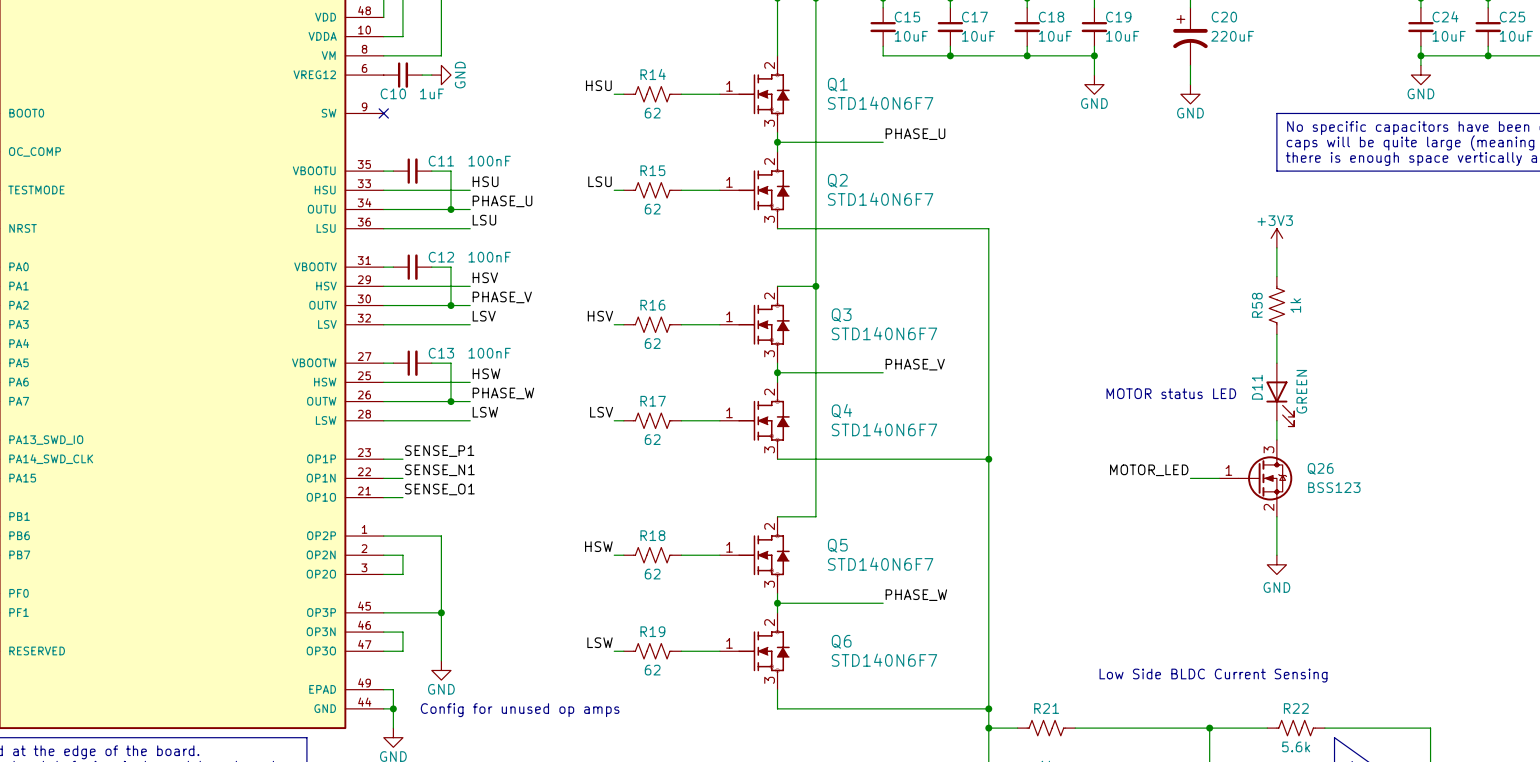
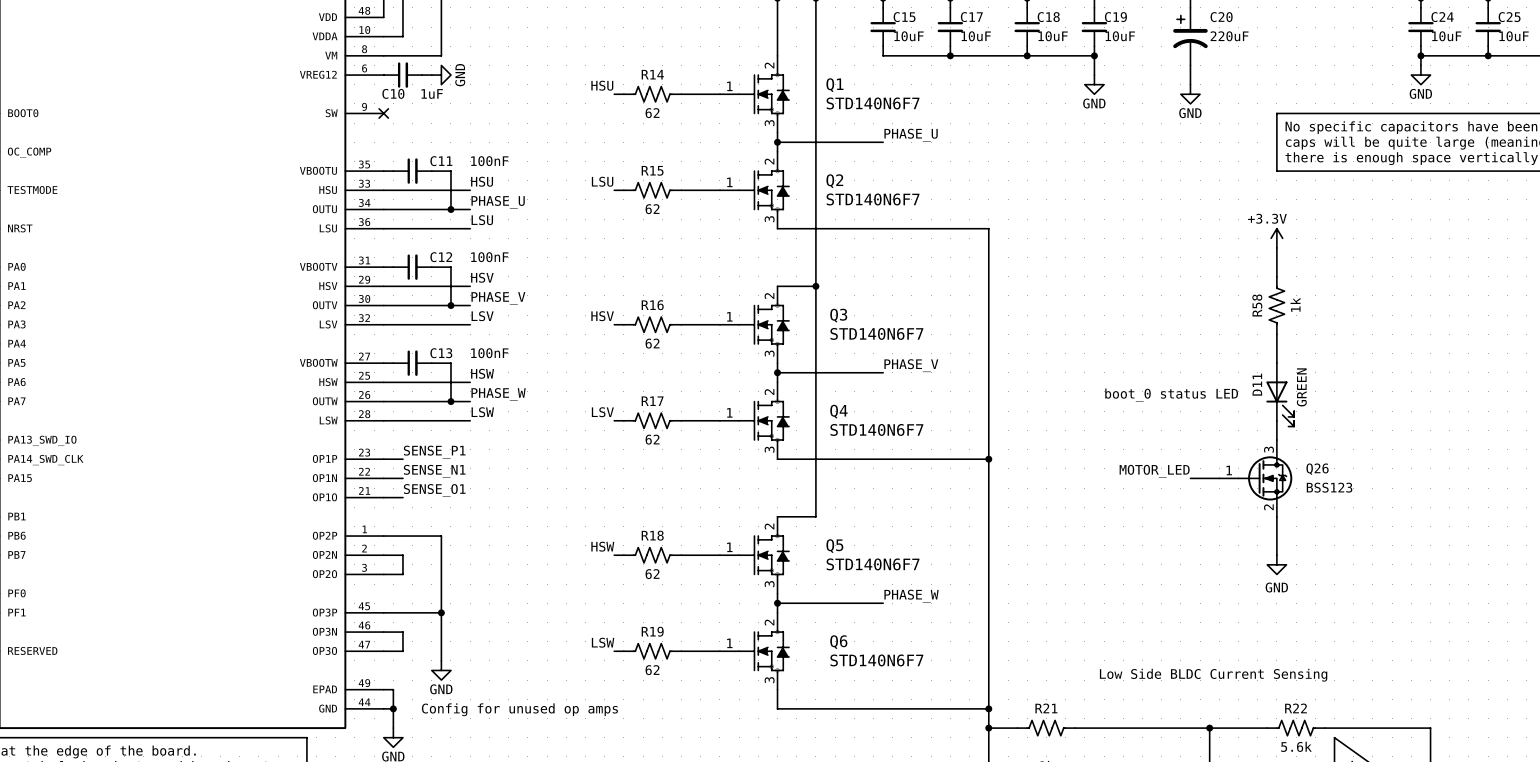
power symbol: +3V3 (1276, 238) -> +3.3V (1276, 238)
text: MOTOR status LED (1171, 393) -> boot_0 status LED (1171, 395)

